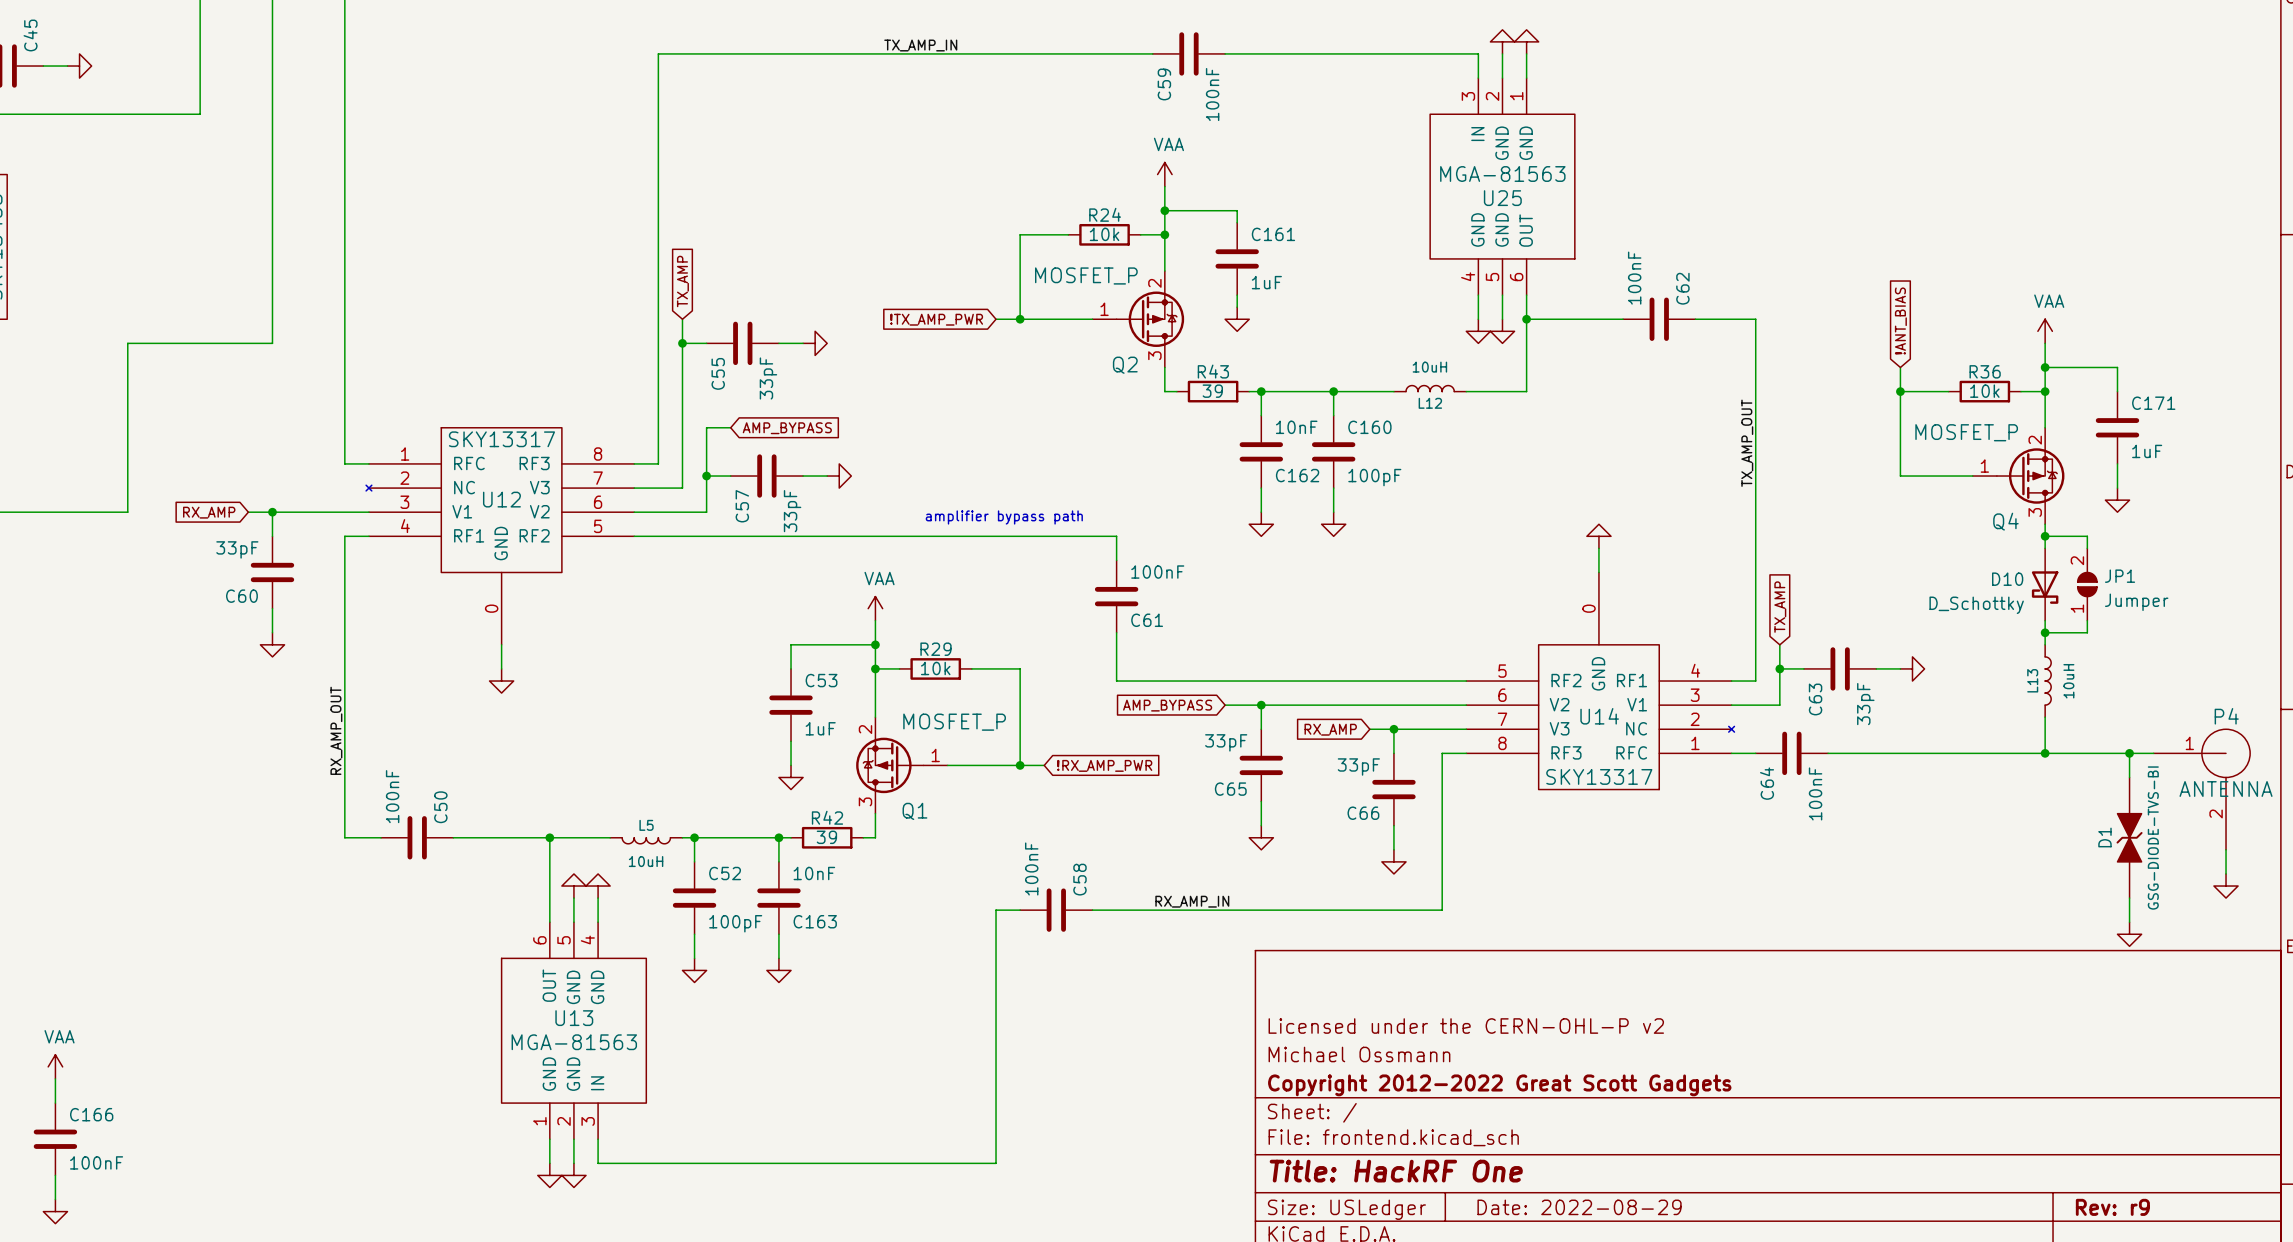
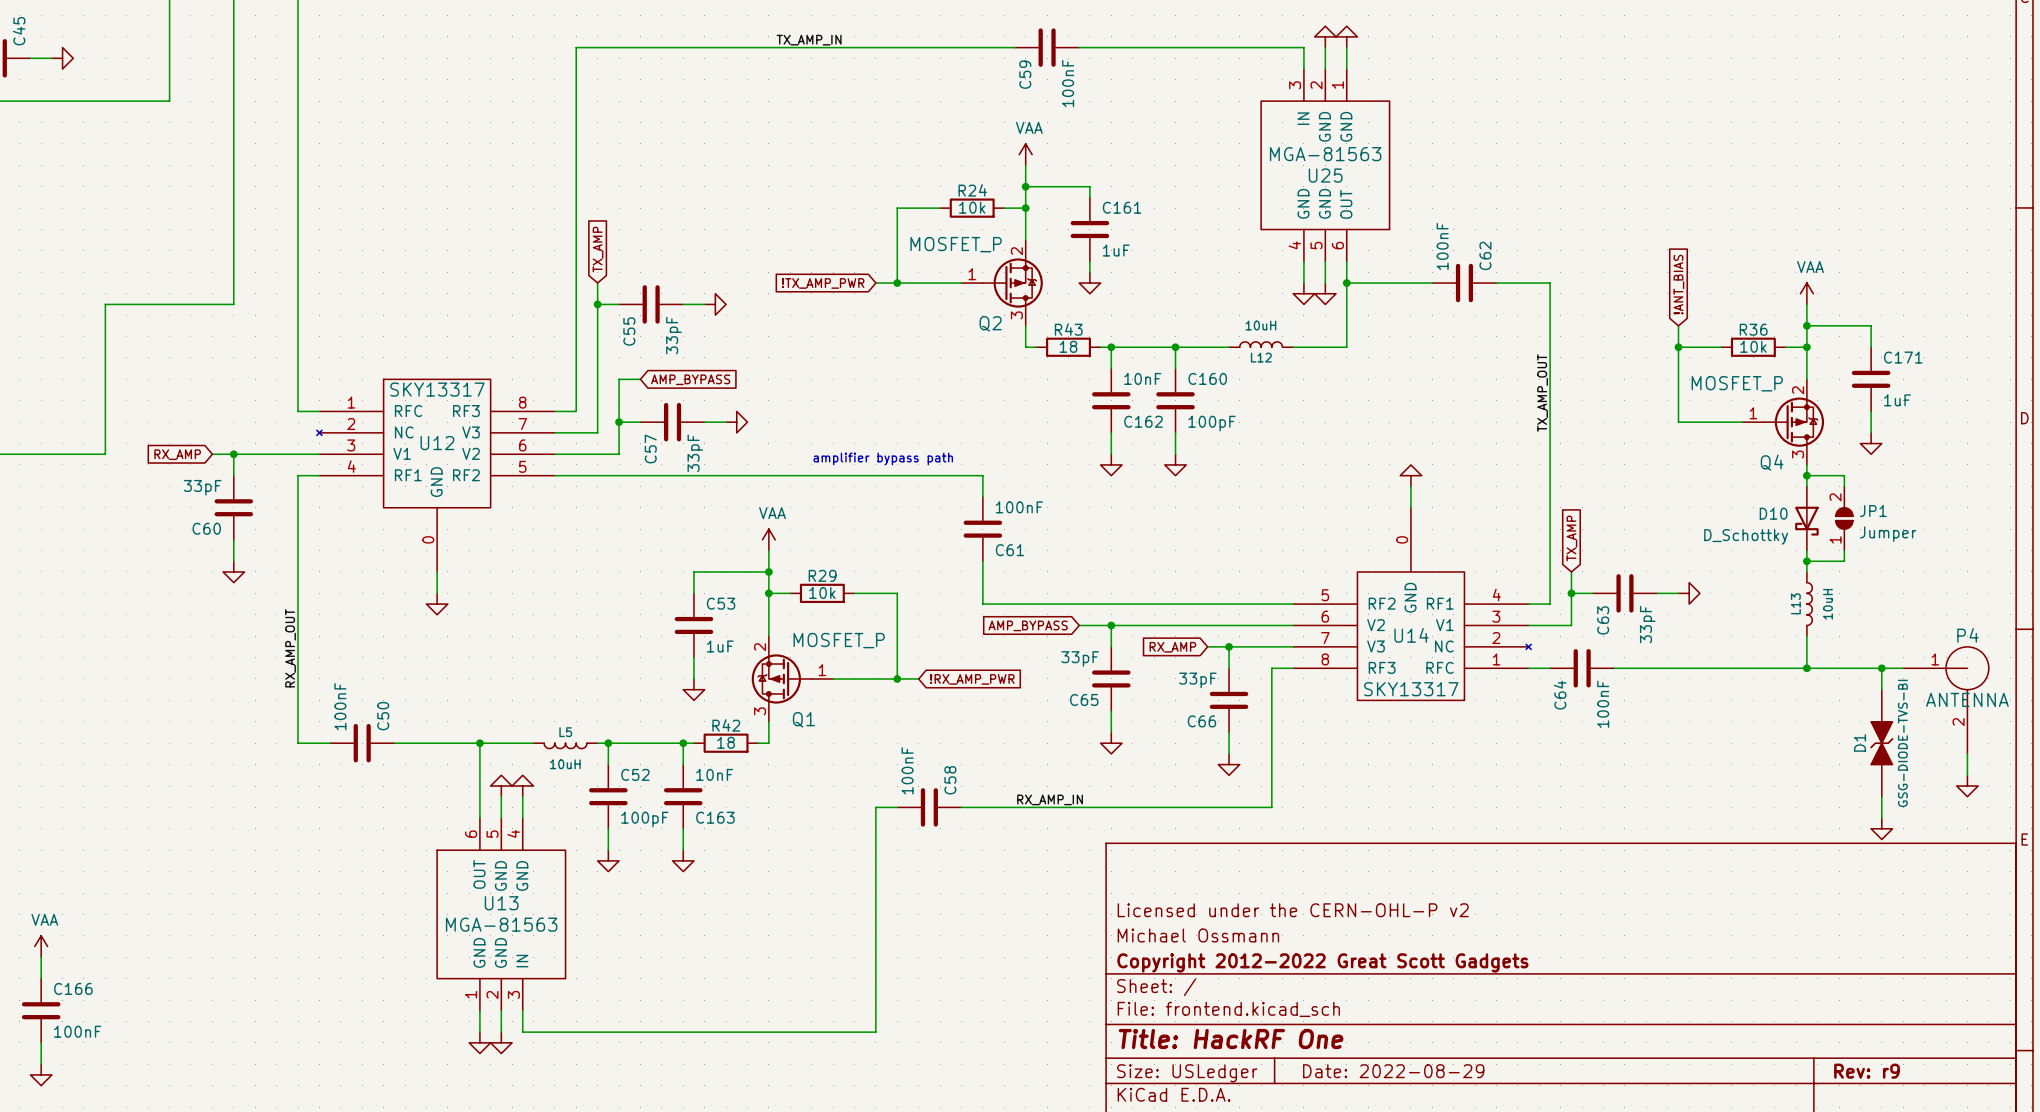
R43 value: 39 (1212, 391) -> 18 (1068, 346)
R42 value: 39 (826, 837) -> 18 (726, 742)

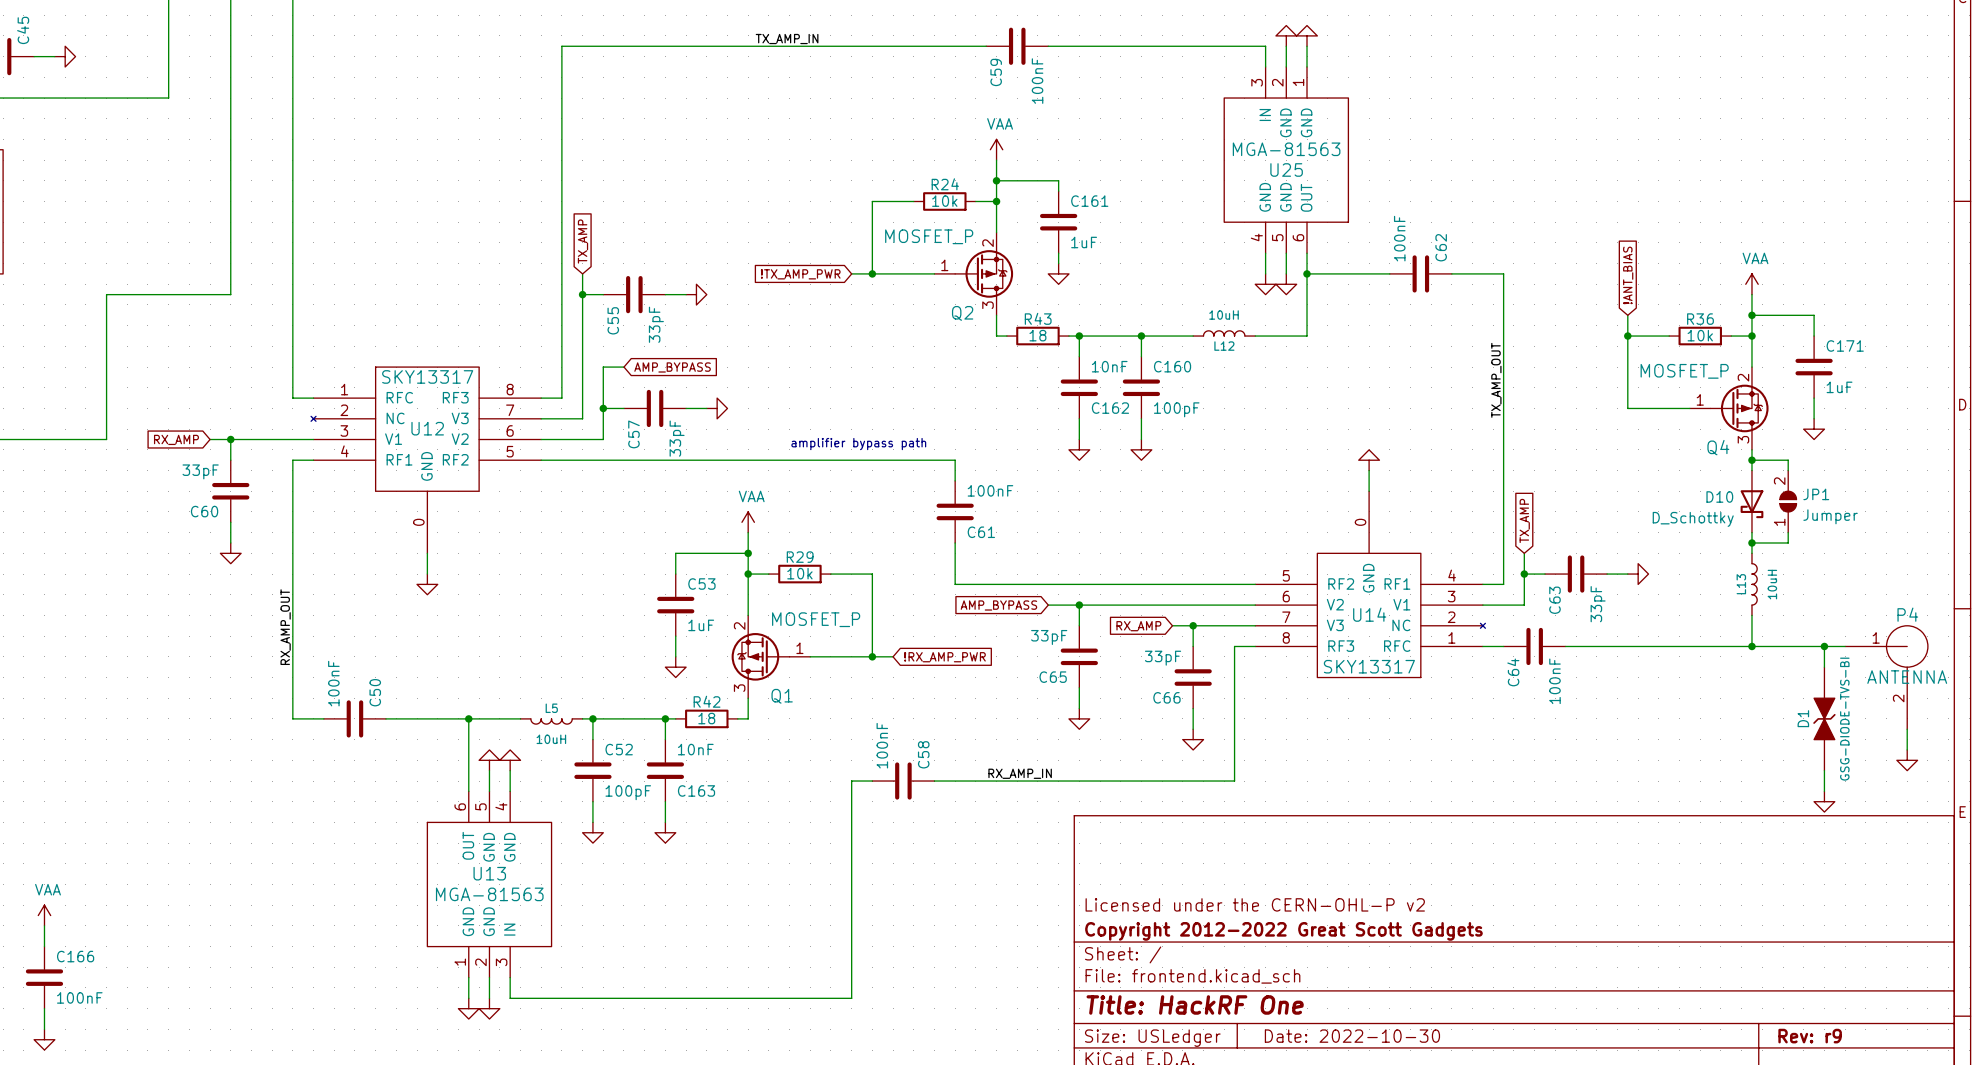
title block: Licensed under the CERN-OHL-P v2 (1293, 910) -> none
title block: Michael Ossmann (1198, 935) -> Licensed under the CERN-OHL-P v2 (1255, 904)
title block: Date: 2022-08-29 (1393, 1071) -> Date: 2022-10-30 (1352, 1036)

